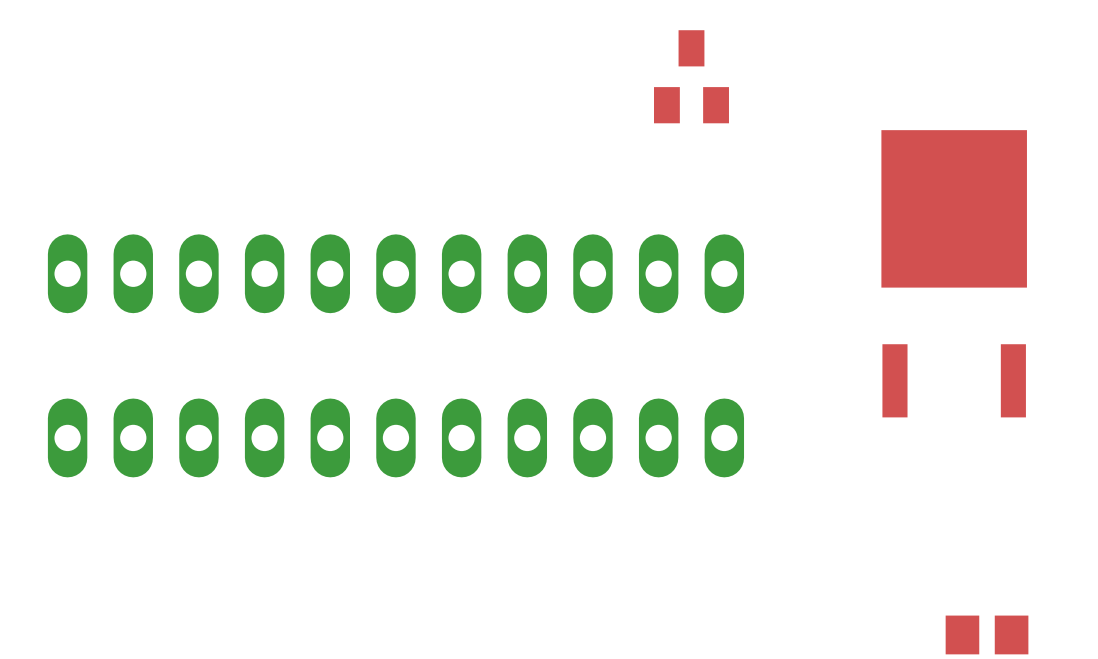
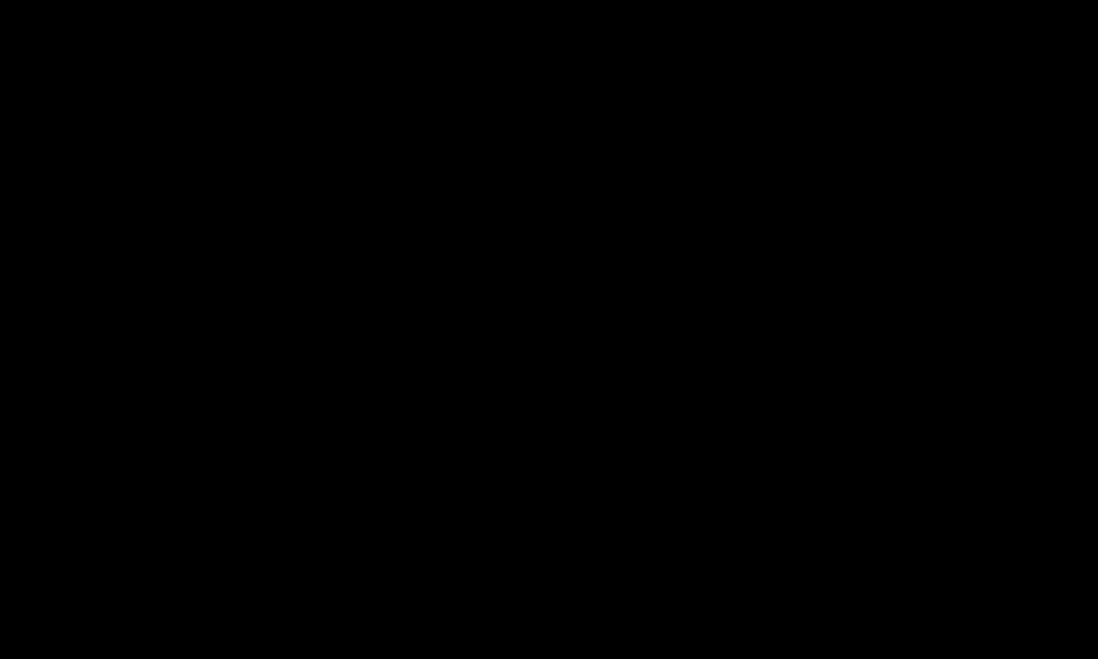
part: (691, 76) -> none
part: (395, 273) -> none
part: (954, 273) -> none
part: (395, 437) -> none
part: (987, 634) -> none

